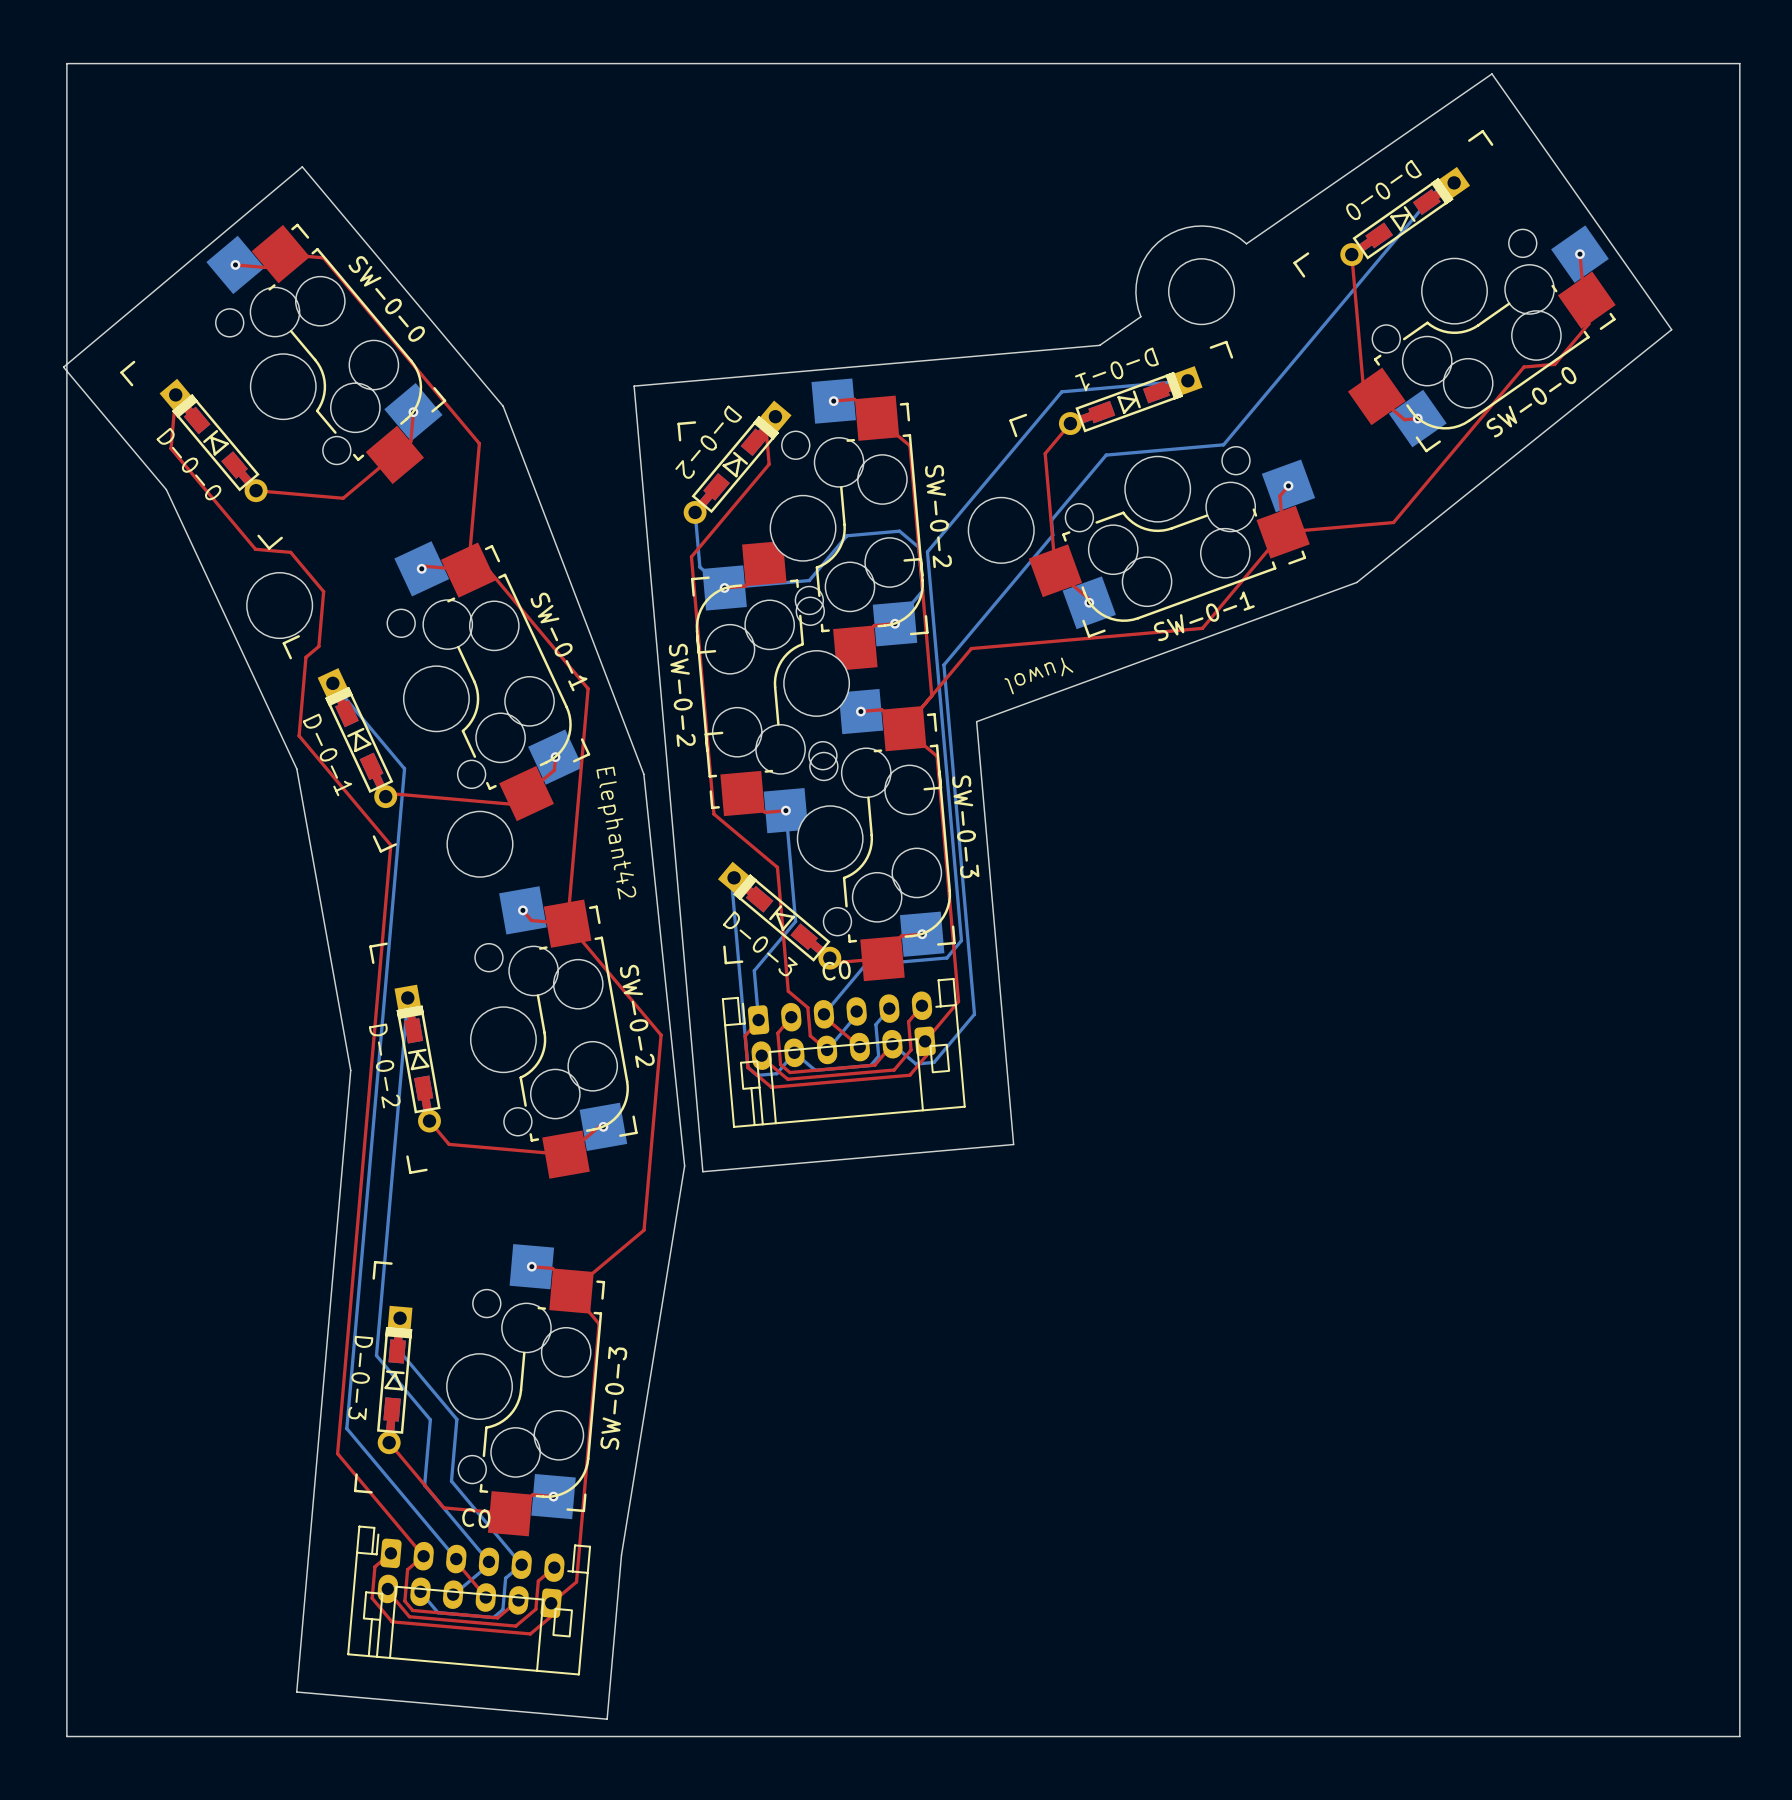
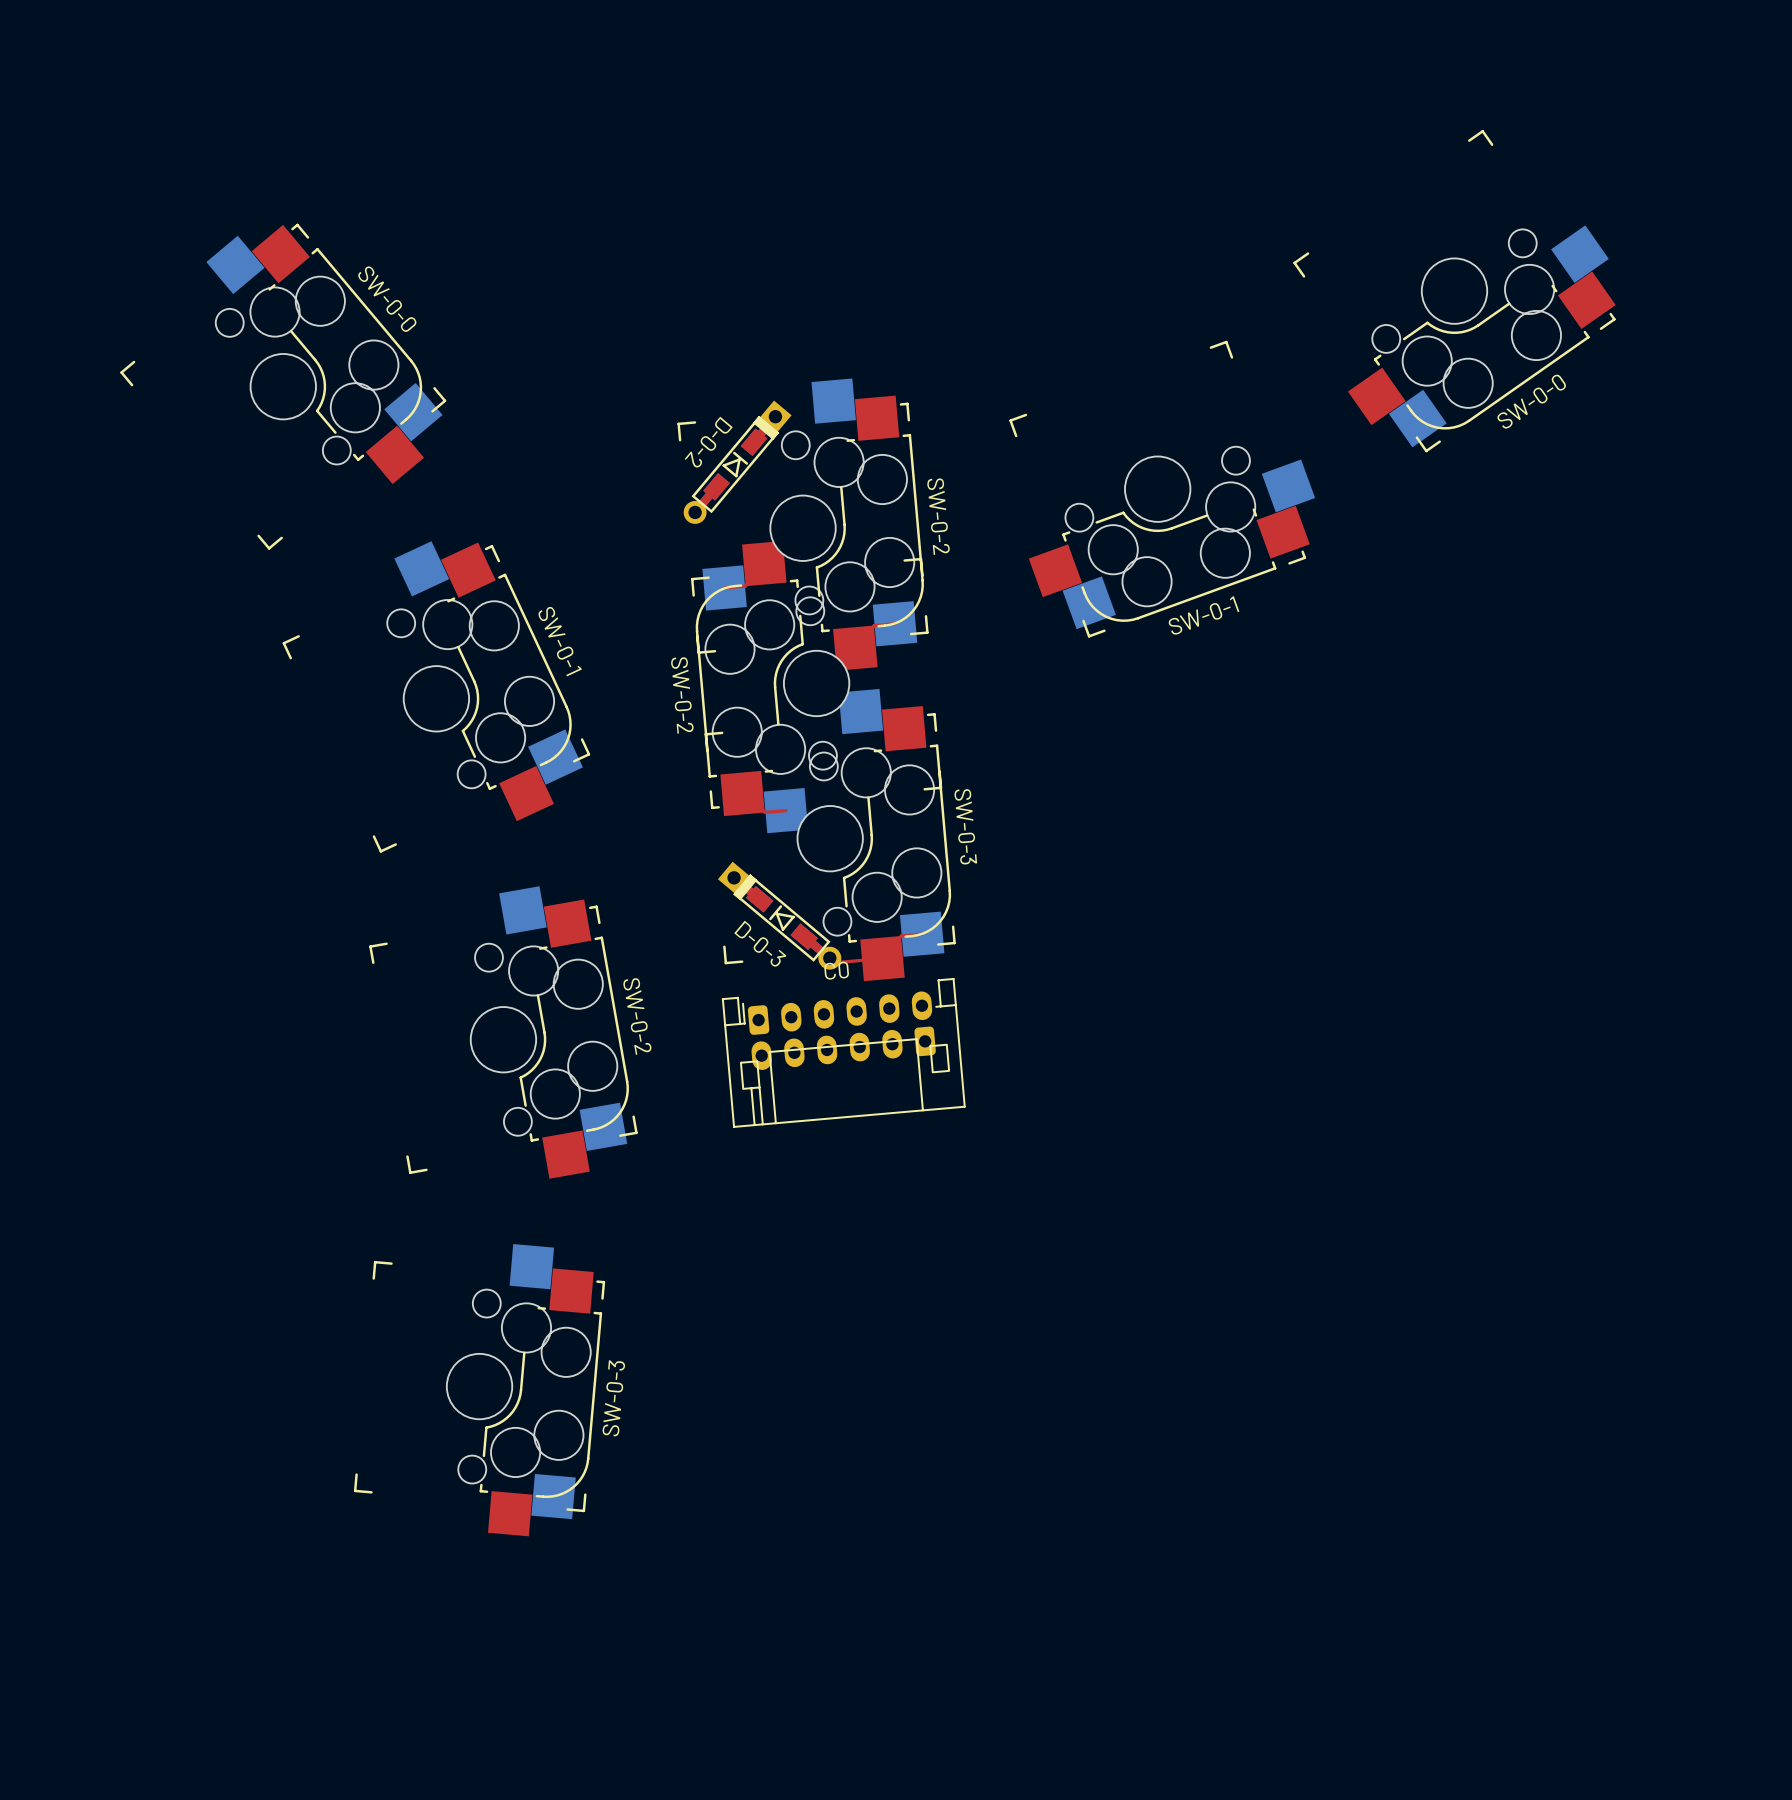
board edge: (66, 63) (66, 1736) (1739, 1736) (1739, 63) (66, 63) -> none
board edge: (1491, 73) (1246, 243) (1233, 234) (1210, 226) (1186, 227) (1164, 237) (1147, 254) (1137, 276) (1136, 301) (1140, 316) (1099, 345) (634, 386) (702, 1171) (1013, 1144) (976, 721) (1356, 582) (1671, 329) (1491, 73) -> none
board edge: (302, 166) (63, 367) (166, 489) (296, 768) (350, 1070) (296, 1692) (607, 1719) (621, 1555) (684, 1166) (643, 774) (503, 406) (302, 166) -> none
bottom track: (1454, 182) (1442, 183) (1223, 444) (1106, 455) (1051, 520) (1052, 535) (943, 665) (974, 1014) (934, 1062) (916, 1064) (892, 1044) -> none
D-0-0: (1405, 216) -> none
top track: (1351, 254) (1363, 384) (1404, 419) (1417, 418) -> none
top track: (1579, 254) (1583, 297) (1586, 300) (1588, 323) (1554, 364) (1524, 367) (1393, 522) (1283, 532) -> none
via: (1579, 254) -> none
round board edge: [1168, 258, 1235, 325] -> none
top track: (235, 264) (264, 267) (280, 254) (323, 257) (479, 443) (468, 570) -> none
via: (235, 264) -> none
bottom track: (1187, 380) (1061, 391) (927, 551) (961, 940) (946, 957) (865, 965) (823, 1014) -> none
top track: (175, 394) (171, 448) (255, 549) (290, 552) (323, 591) (318, 646) (305, 657) (299, 735) (390, 845) (337, 1453) (423, 1556) (407, 1569) (404, 1601) (412, 1610) (497, 1617) (518, 1600) -> none
D-0-1: (1130, 400) -> none
top track: (833, 401) (854, 399) (909, 445) (931, 695) -> none
via: (833, 401) -> none
top track: (413, 412) (410, 441) (343, 498) (256, 490) -> none
via: (413, 412) -> none
top track: (775, 416) (765, 427) (769, 464) (691, 556) (713, 814) (777, 867) (788, 991) (807, 1007) (810, 1035) (827, 1049) -> none
via: (1417, 418) -> none
top track: (1070, 423) (1045, 453) (1055, 570) (1088, 598) (1089, 602) -> none
D-0-0: (213, 440) -> none
top track: (1288, 485) (1279, 496) (1283, 532) -> none
via: (1288, 485) -> none
round board edge: [968, 497, 1035, 564] -> none
bottom track: (695, 512) (699, 567) (724, 587) (809, 580) (846, 535) (899, 531) (918, 547) (922, 590) (895, 623) -> none
top track: (1283, 532) (1202, 628) (971, 648) (904, 728) -> none
top track: (421, 568) (424, 566) (490, 572) (588, 688) (567, 923) -> none
via: (421, 568) -> none
round board edge: [246, 572, 313, 639] -> none
via: (724, 587) -> none
via: (1089, 602) -> none
via: (895, 623) -> none
text: Yuwol (1038, 675) -> none
bottom track: (332, 683) (404, 768) (346, 1428) (456, 1559) -> none
top track: (860, 711) (881, 709) (937, 756) (958, 1001) (925, 1041) (926, 1055) (909, 1075) (771, 1087) (747, 1067) (745, 1036) (758, 1020) -> none
via: (860, 711) -> none
D-0-1: (357, 738) -> none
top track: (555, 757) (554, 770) (513, 804) (389, 793) (385, 796) -> none
via: (555, 757) -> none
bottom track: (785, 810) (795, 921) (754, 970) (758, 1020) -> none
via: (785, 810) -> none
round board edge: [446, 811, 514, 878] -> none
text: Elephant42 (616, 833) -> none
bottom track: (734, 877) (731, 880) (747, 1067) (757, 1075) (776, 1073) (794, 1052) (815, 1070) (870, 1065) (878, 1056) (875, 1024) (889, 1008) -> none
top track: (522, 910) (531, 920) (567, 923) -> none
via: (522, 910) -> none
top track: (567, 923) (661, 1035) (644, 1230) (571, 1291) -> none
via: (922, 934) -> none
bottom track: (407, 997) (376, 1355) (430, 1419) (424, 1485) (488, 1561) -> none
top track: (921, 1005) (908, 1021) (911, 1049) (894, 1070) (787, 1079) (761, 1057) -> none
bottom track: (857, 1014) (827, 1049) -> none
top track: (791, 1017) (777, 1033) (780, 1064) (789, 1072) (874, 1065) (892, 1044) -> none
top track: (824, 1017) (860, 1047) -> none
D-0-2: (417, 1058) -> none
top track: (429, 1121) (449, 1144) (566, 1154) (599, 1126) (603, 1126) -> none
via: (603, 1126) -> none
top track: (531, 1266) (552, 1268) (599, 1323) (576, 1582) (551, 1603) (549, 1617) (530, 1633) (391, 1621) (372, 1598) (374, 1566) (390, 1553) -> none
via: (531, 1266) -> none
bottom track: (400, 1318) (397, 1348) (456, 1419) (451, 1481) (521, 1564) (505, 1578) (502, 1609) (493, 1617) (438, 1612) (420, 1591) -> none
D-0-3: (394, 1379) -> none
top track: (389, 1442) (443, 1507) (510, 1513) (532, 1494) (553, 1496) -> none
via: (553, 1496) -> none
top track: (456, 1562) (486, 1597) -> none
bottom track: (489, 1564) (453, 1594) -> none
top track: (554, 1567) (538, 1581) (535, 1609) (515, 1626) (409, 1616) (387, 1590) -> none
C0: (469, 1600) -> none

